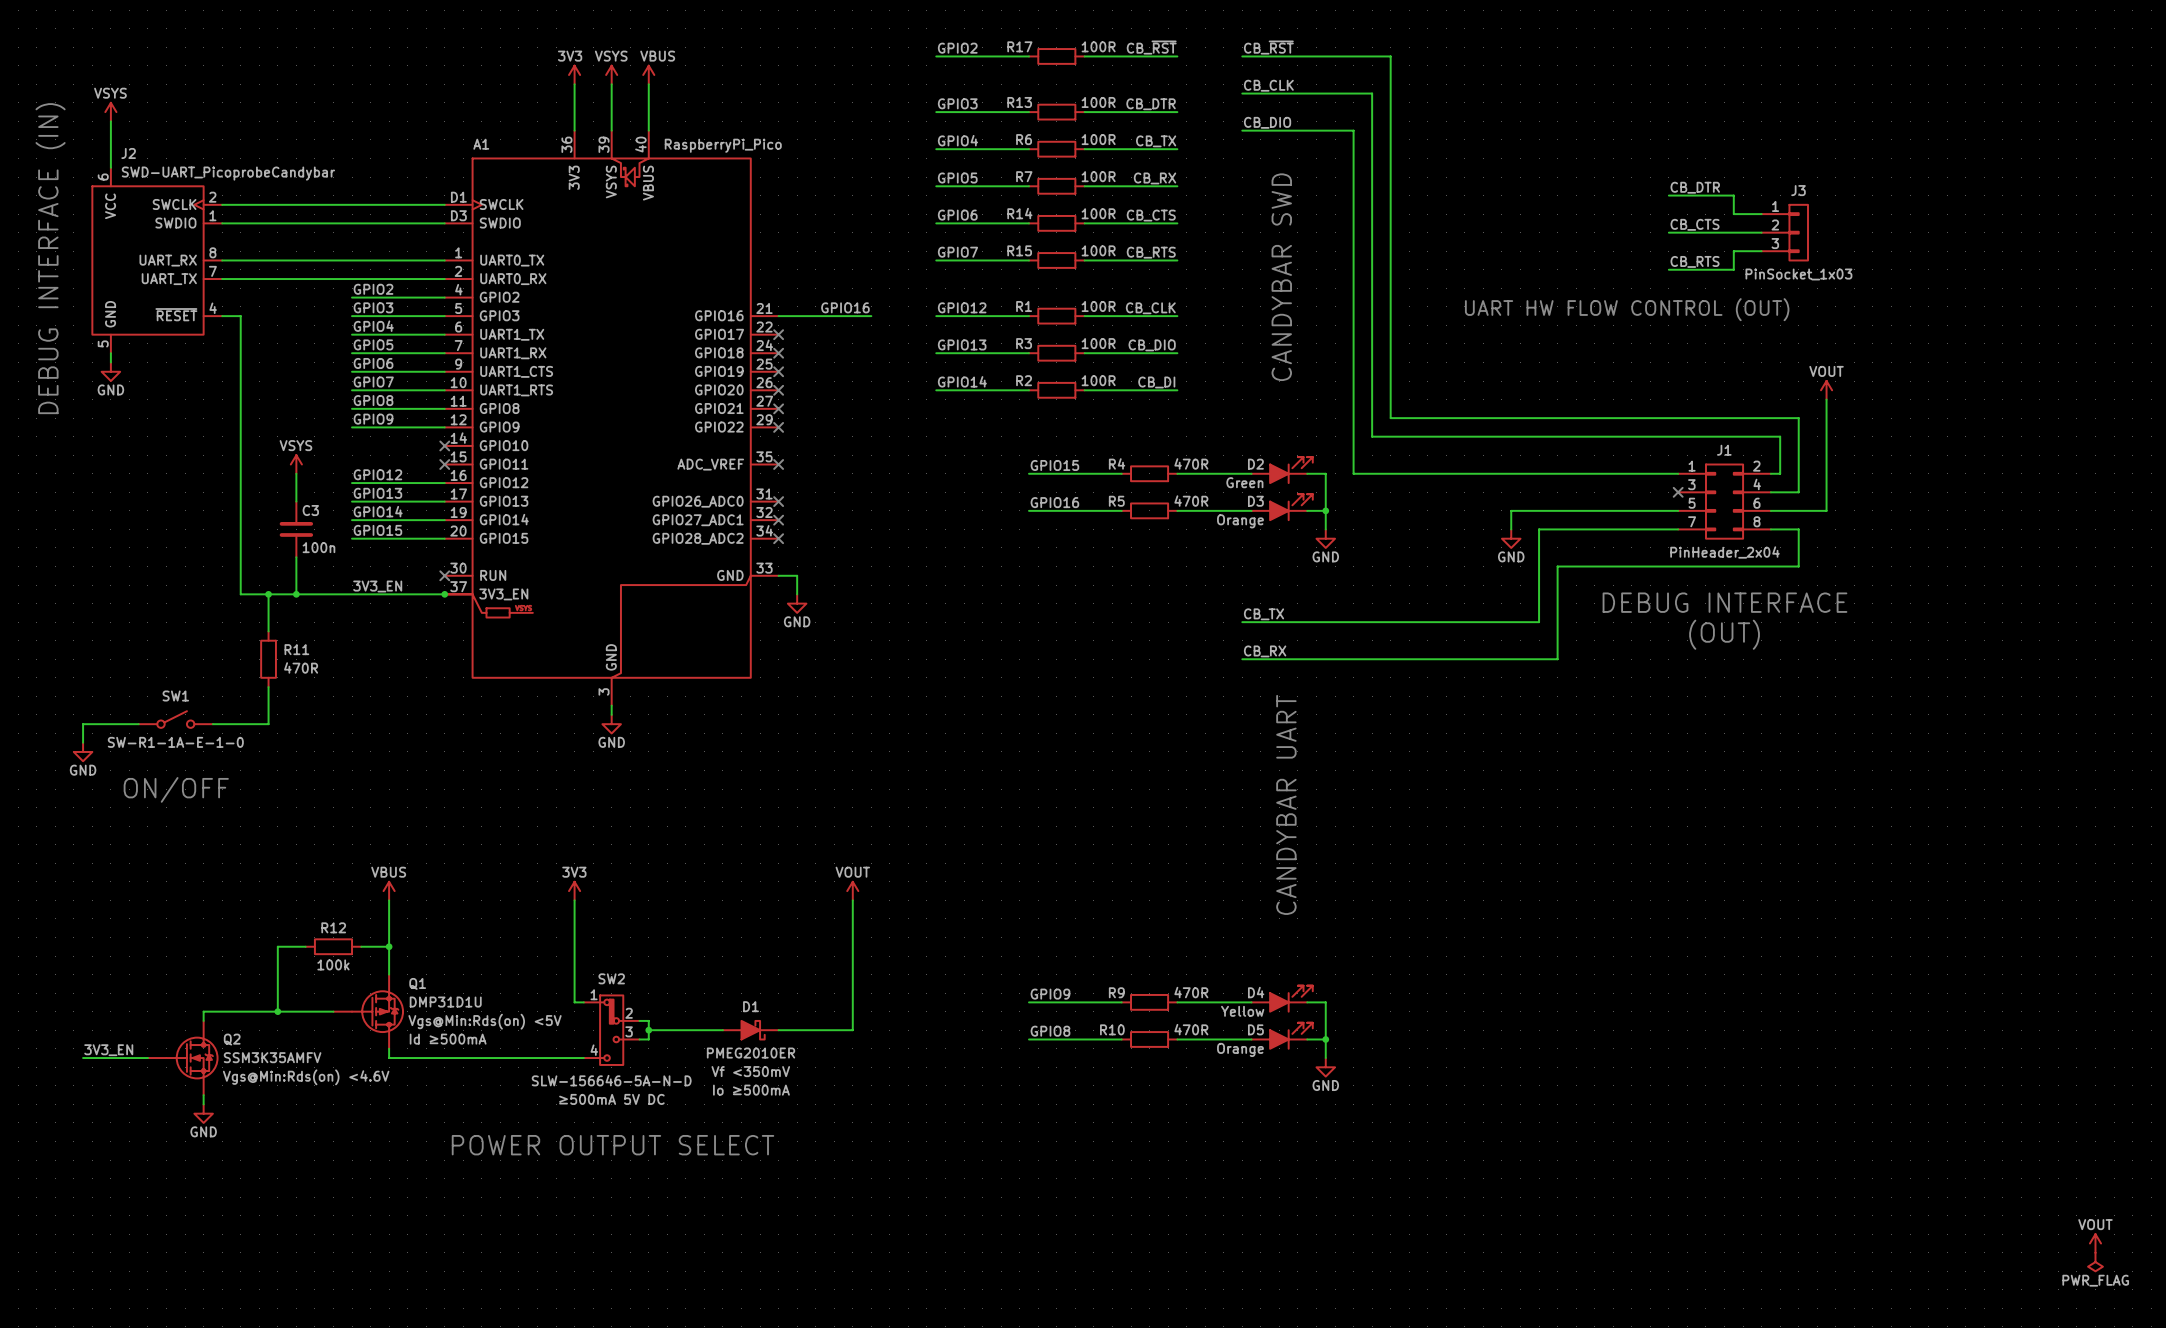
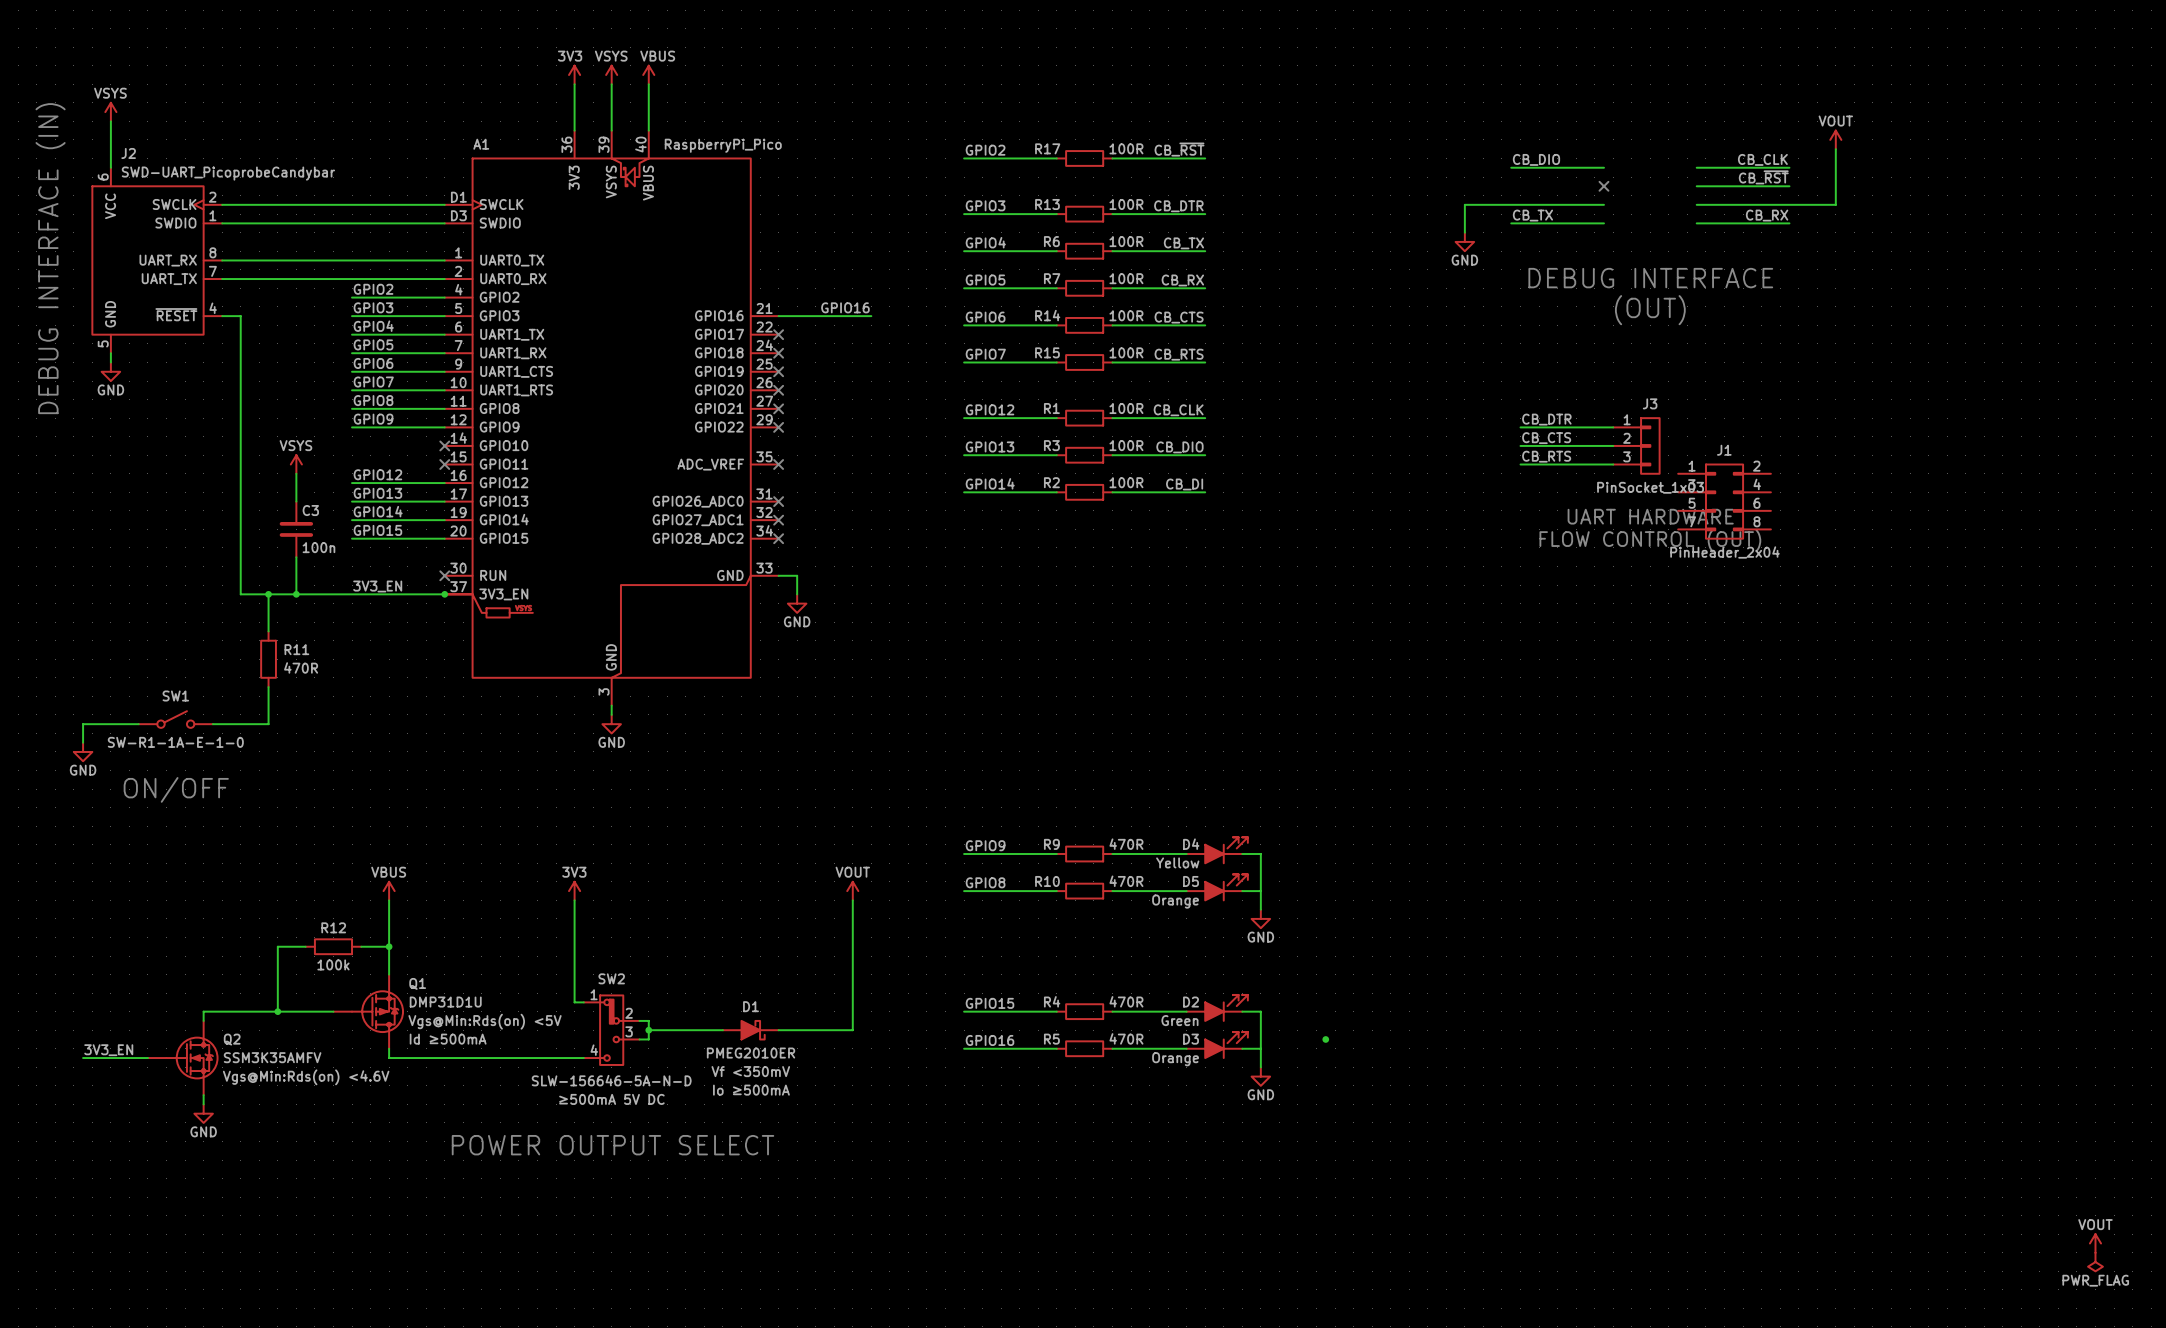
label: CB_~{RST} (1151, 47) -> none
label: CB_~{RST} (1268, 47) -> none
label position: GPIO2 (957, 48) -> GPIO2 (985, 150)
wire: (936, 56) (1029, 56) -> (964, 158) (1056, 158)
R17 position: (1056, 56) -> (1084, 158)
wire: (1084, 56) (1177, 56) -> (1112, 158) (1205, 158)
wire: (1242, 56) (1390, 56) (1390, 418) (1798, 418) (1798, 492) (1770, 492) -> none
label: CB_CLK (1268, 85) -> none
wire: (1242, 93) (1372, 93) (1372, 436) (1780, 436) (1780, 473) (1770, 473) -> none
label position: GPIO3 (957, 103) -> GPIO3 (985, 205)
label position: CB_DTR (1151, 104) -> CB_DTR (1178, 206)
wire: (936, 112) (1029, 112) -> (964, 214) (1056, 214)
R13 position: (1056, 112) -> (1084, 214)
wire: (1084, 112) (1177, 112) -> (1112, 214) (1205, 214)
label: CB_DIO (1267, 122) -> none
wire: (1242, 130) (1353, 130) (1353, 473) (1678, 473) -> none
power symbol: none -> VOUT (1835, 139)
label position: GPIO4 (957, 140) -> GPIO4 (985, 242)
label position: CB_TX (1156, 141) -> CB_TX (1183, 243)
wire: (936, 149) (1029, 149) -> (964, 251) (1056, 251)
R6 position: (1056, 149) -> (1084, 251)
wire: (1084, 149) (1177, 149) -> (1112, 251) (1205, 251)
label: none -> CB_~{RST} (1179, 149)
wire: none -> (1835, 149) (1835, 204) (1696, 204)
label: none -> CB_DIO (1536, 159)
label: none -> CB_CLK (1762, 159)
wire: none -> (1511, 167) (1603, 167)
label: none -> CB_~{RST} (1763, 177)
label position: GPIO5 (957, 178) -> GPIO5 (985, 280)
label position: CB_RX (1155, 178) -> CB_RX (1182, 280)
wire: (936, 186) (1029, 186) -> (964, 288) (1056, 288)
R7 position: (1056, 186) -> (1084, 288)
wire: (1084, 186) (1177, 186) -> (1112, 288) (1205, 288)
no-connect mark: none -> (1603, 186)
wire: none -> (1696, 186) (1789, 186)
label: CB_DTR (1695, 187) -> none
wire: (1668, 195) (1733, 195) (1733, 214) (1761, 214) -> none
wire: none -> (1603, 204) (1464, 204) (1464, 232)
label position: GPIO6 (957, 215) -> GPIO6 (985, 317)
label position: CB_CTS (1151, 215) -> CB_CTS (1179, 317)
label: none -> CB_TX (1532, 215)
label: none -> CB_RX (1767, 215)
wire: (936, 223) (1029, 223) -> (964, 325) (1056, 325)
R14 position: (1056, 223) -> (1084, 325)
wire: (1084, 223) (1177, 223) -> (1112, 325) (1205, 325)
wire: none -> (1511, 223) (1603, 223)
wire: none -> (1696, 223) (1789, 223)
label: CB_CTS (1695, 224) -> none
wire: (1668, 232) (1761, 232) -> (1696, 167) (1789, 167)
J3 position: (1785, 232) -> (1636, 445)
power symbol: none -> GND (1464, 241)
wire: (1761, 251) (1733, 251) (1733, 269) (1668, 269) -> none
label position: GPIO7 (957, 252) -> GPIO7 (985, 354)
label position: CB_RTS (1151, 252) -> CB_RTS (1179, 354)
wire: (936, 260) (1029, 260) -> (964, 362) (1056, 362)
R15 position: (1056, 260) -> (1084, 362)
wire: (1084, 260) (1177, 260) -> (1112, 362) (1205, 362)
label: CB_RTS (1695, 261) -> none
text: CANDYBAR SWD (1281, 277) -> none
text: none -> DEBUG INTERFACE (1650, 278)
label position: GPIO12 (962, 307) -> GPIO12 (989, 409)
label position: CB_CLK (1150, 308) -> CB_CLK (1178, 410)
text: UART HW FLOW CONTROL (OUT) (1627, 309) -> none
text: none -> (OUT) (1650, 310)
wire: (936, 316) (1029, 316) -> (964, 418) (1056, 418)
R1 position: (1056, 316) -> (1084, 418)
wire: (1084, 316) (1177, 316) -> (1112, 418) (1205, 418)
label position: GPIO13 (962, 344) -> GPIO13 (989, 446)
label position: CB_DIO (1152, 345) -> CB_DIO (1179, 447)
wire: (936, 353) (1029, 353) -> (964, 455) (1056, 455)
R3 position: (1056, 353) -> (1084, 455)
wire: (1084, 353) (1177, 353) -> (1112, 455) (1205, 455)
label position: GPIO14 (962, 381) -> GPIO14 (990, 483)
label position: CB_DI (1156, 382) -> CB_DI (1184, 484)
wire: (936, 390) (1029, 390) -> (964, 492) (1056, 492)
R2 position: (1056, 390) -> (1084, 492)
wire: (1084, 390) (1177, 390) -> (1112, 492) (1205, 492)
power symbol: VOUT (1826, 390) -> none
wire: (1826, 399) (1826, 510) (1770, 510) -> none
label: none -> CB_DTR (1546, 419)
wire: none -> (1520, 427) (1613, 427)
label: none -> CB_CTS (1546, 438)
wire: none -> (1520, 445) (1613, 445)
label: none -> CB_RTS (1546, 456)
wire: none -> (1520, 464) (1613, 464)
label: GPIO15 (1054, 465) -> none
D2 position: (1282, 470) -> (1217, 1008)
wire: (1029, 473) (1121, 473) -> none
R4 position: (1149, 473) -> (1084, 1011)
wire: (1177, 473) (1251, 473) -> none
wire: (1307, 473) (1325, 473) (1325, 529) -> none
no-connect mark: (1678, 492) -> none
label: GPIO16 (1054, 502) -> none
D3 position: (1282, 507) -> (1217, 1045)
wire: (1029, 510) (1121, 510) -> none
R5 position: (1149, 510) -> (1084, 1048)
wire: (1177, 510) (1251, 510) -> none
wire: (1307, 510) (1325, 510) -> none
junction: (1325, 510) -> none
wire: (1678, 510) (1511, 510) (1511, 529) -> none
text: none -> UART HARDWARE (1650, 516)
wire: (1678, 529) (1539, 529) (1539, 622) (1242, 622) -> none
wire: (1770, 529) (1798, 529) (1798, 566) (1557, 566) (1557, 659) (1242, 659) -> none
power symbol: GND (1325, 538) -> none
power symbol: GND (1511, 538) -> none
text: none -> FLOW CONTROL (OUT) (1650, 540)
text: DEBUG INTERFACE (1724, 602) -> none
label: CB_TX (1264, 614) -> none
text: (OUT) (1724, 634) -> none
label: CB_RX (1265, 651) -> none
text: CANDYBAR UART (1286, 804) -> none
power symbol: none -> GND (1260, 918)
label position: GPIO9 (1050, 994) -> GPIO9 (985, 845)
D4 position: (1282, 999) -> (1217, 850)
wire: (1029, 1002) (1121, 1002) -> (964, 854) (1056, 854)
R9 position: (1149, 1002) -> (1084, 854)
wire: (1177, 1002) (1251, 1002) -> (1112, 854) (1186, 854)
wire: (1307, 1002) (1325, 1002) (1325, 1058) -> (1242, 854) (1260, 854) (1260, 909)
label: none -> GPIO15 (989, 1003)
wire: none -> (964, 1011) (1056, 1011)
wire: none -> (1112, 1011) (1186, 1011)
wire: none -> (1242, 1011) (1260, 1011) (1260, 1067)
label position: GPIO8 (1050, 1031) -> GPIO8 (985, 882)
D5 position: (1282, 1036) -> (1217, 887)
wire: (1029, 1039) (1121, 1039) -> (964, 891) (1056, 891)
R10 position: (1149, 1039) -> (1084, 891)
wire: (1177, 1039) (1251, 1039) -> (1112, 891) (1186, 891)
wire: (1307, 1039) (1325, 1039) -> (1242, 891) (1260, 891)
label: none -> GPIO16 (989, 1040)
wire: none -> (964, 1048) (1056, 1048)
wire: none -> (1112, 1048) (1186, 1048)
power symbol position: GND (1325, 1067) -> GND (1260, 1076)

